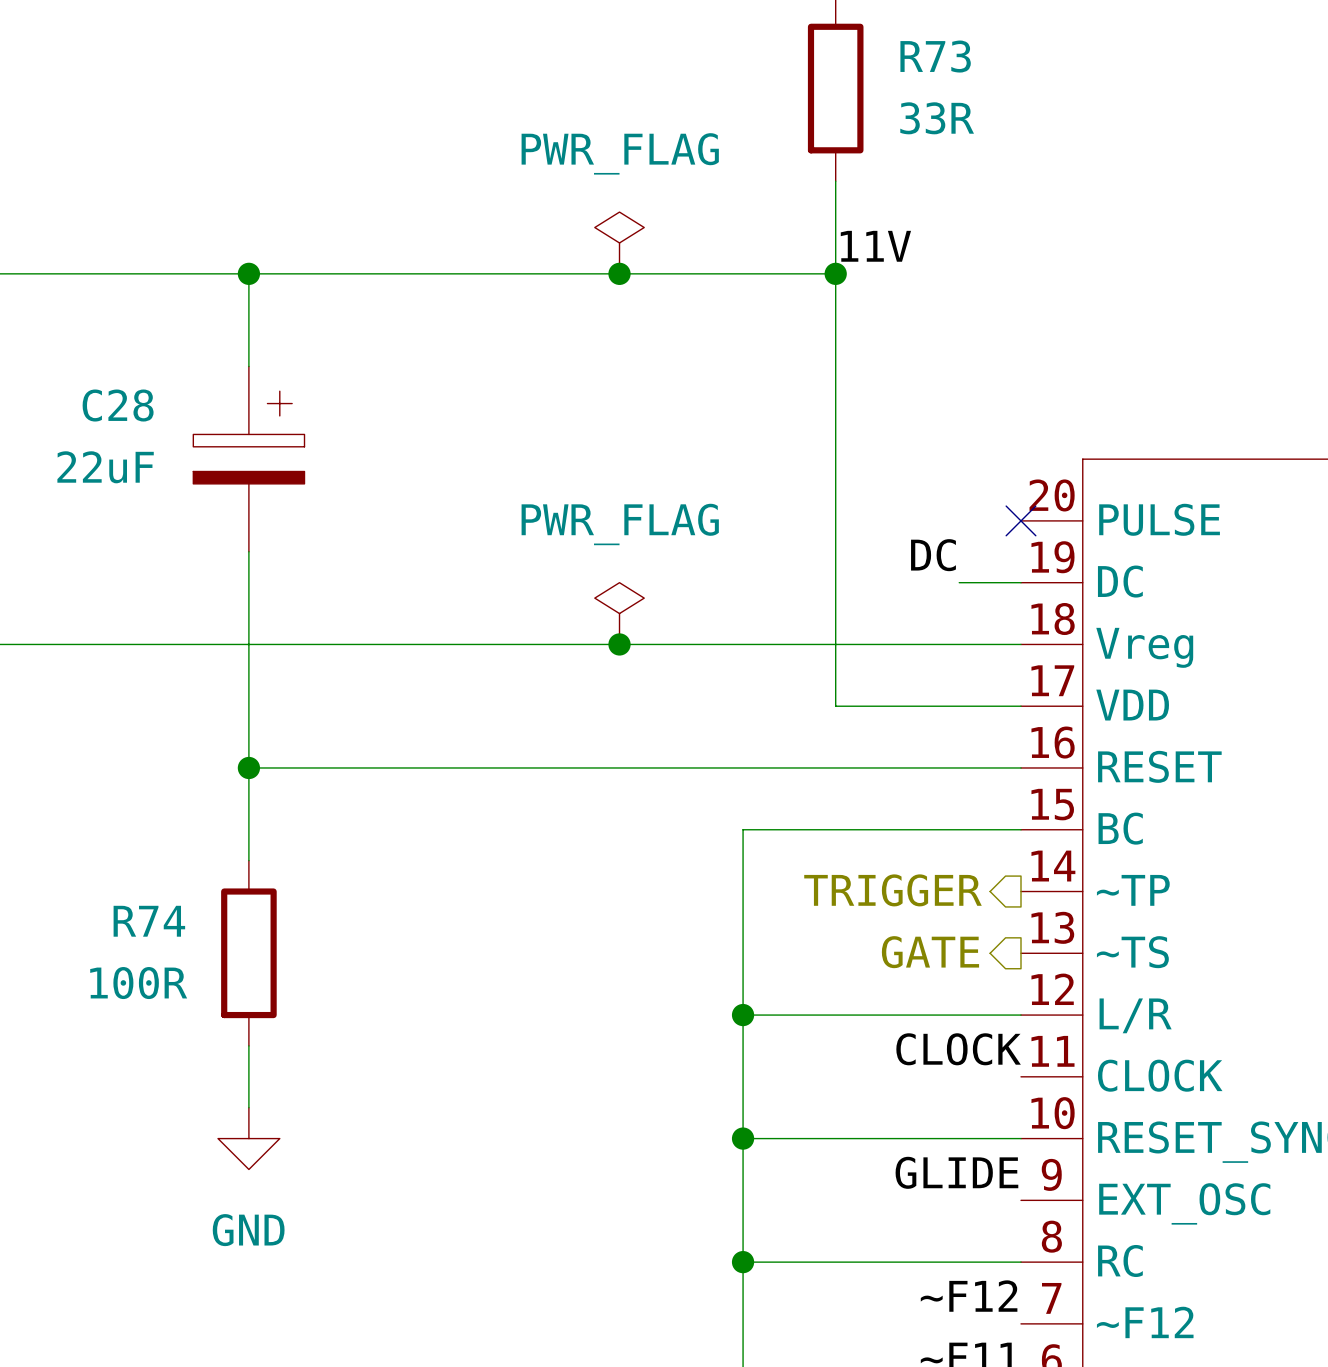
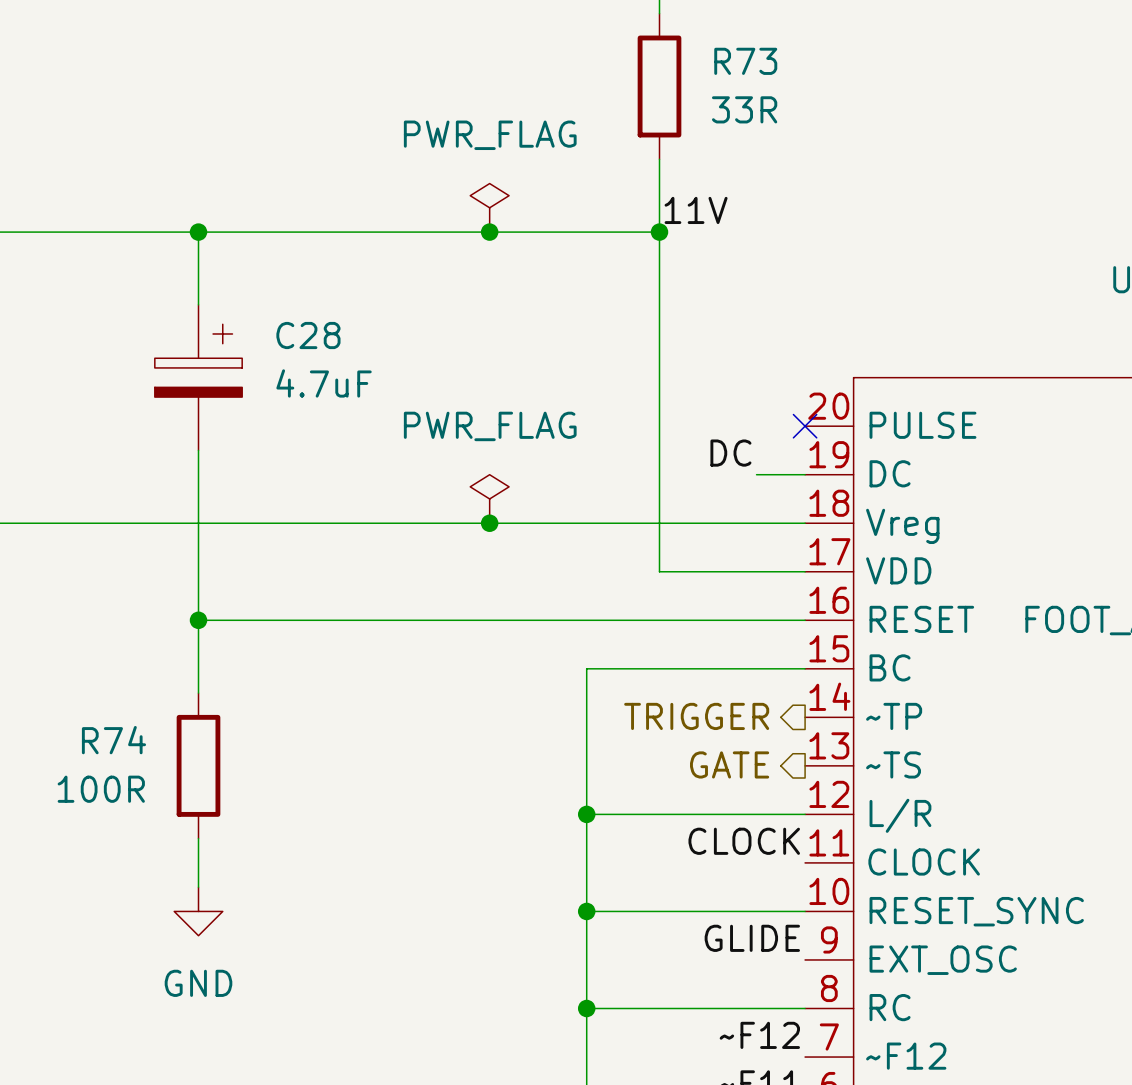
C28 name position: C28 (118, 405) -> C28 (308, 335)
C28 value: 22uF (105, 467) -> 4.7uF (324, 383)

